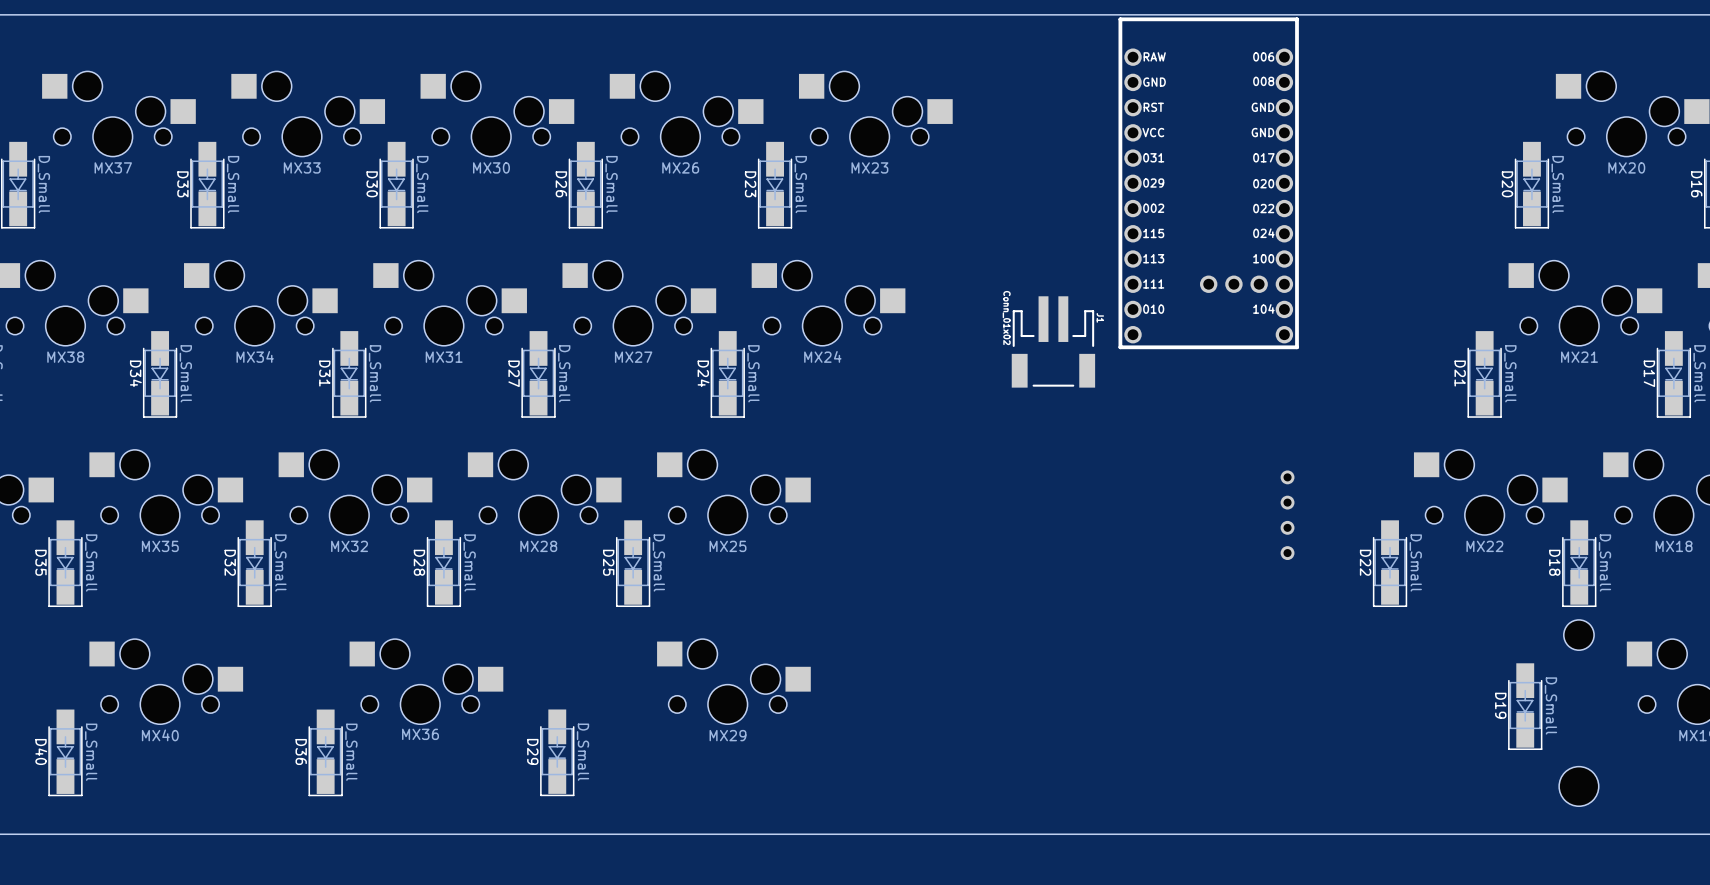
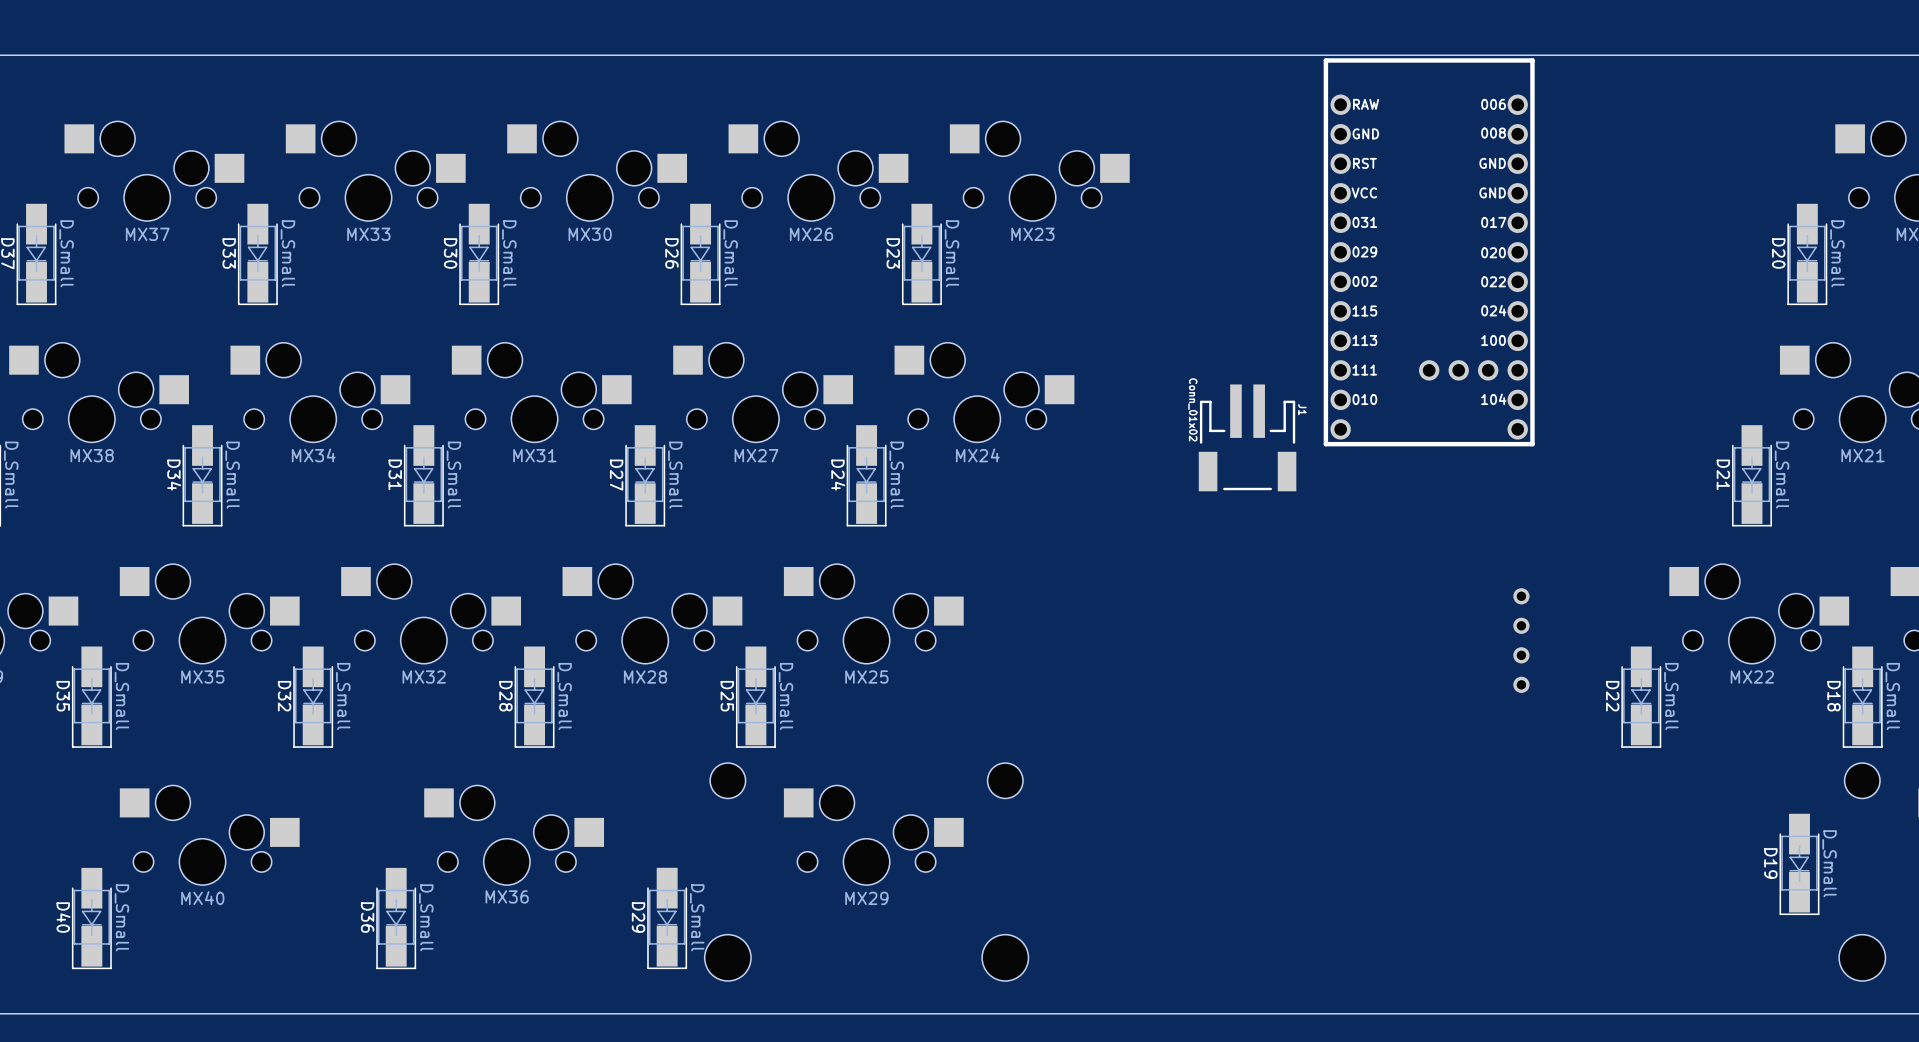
MX29 footprint: [657, 639, 811, 725] -> [704, 763, 1029, 982]

